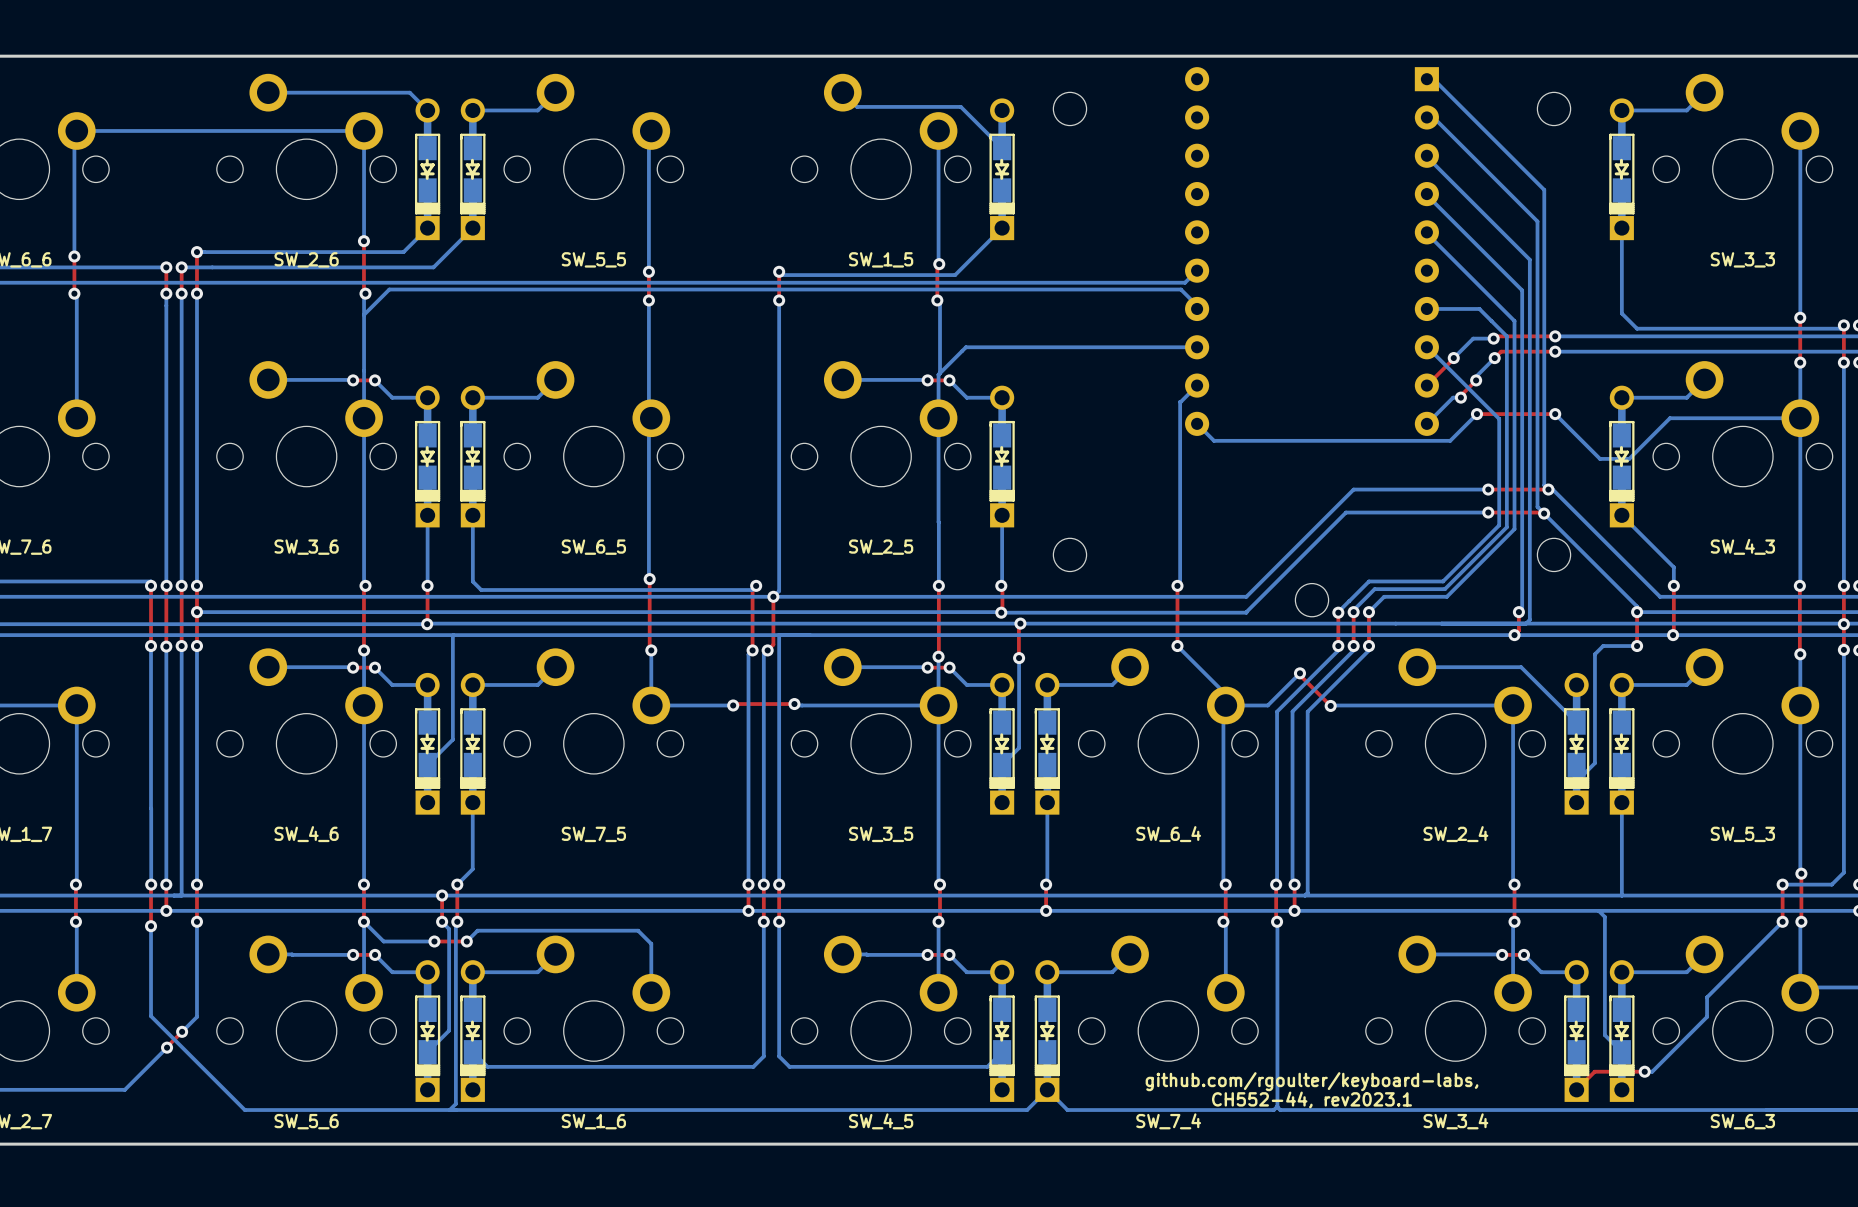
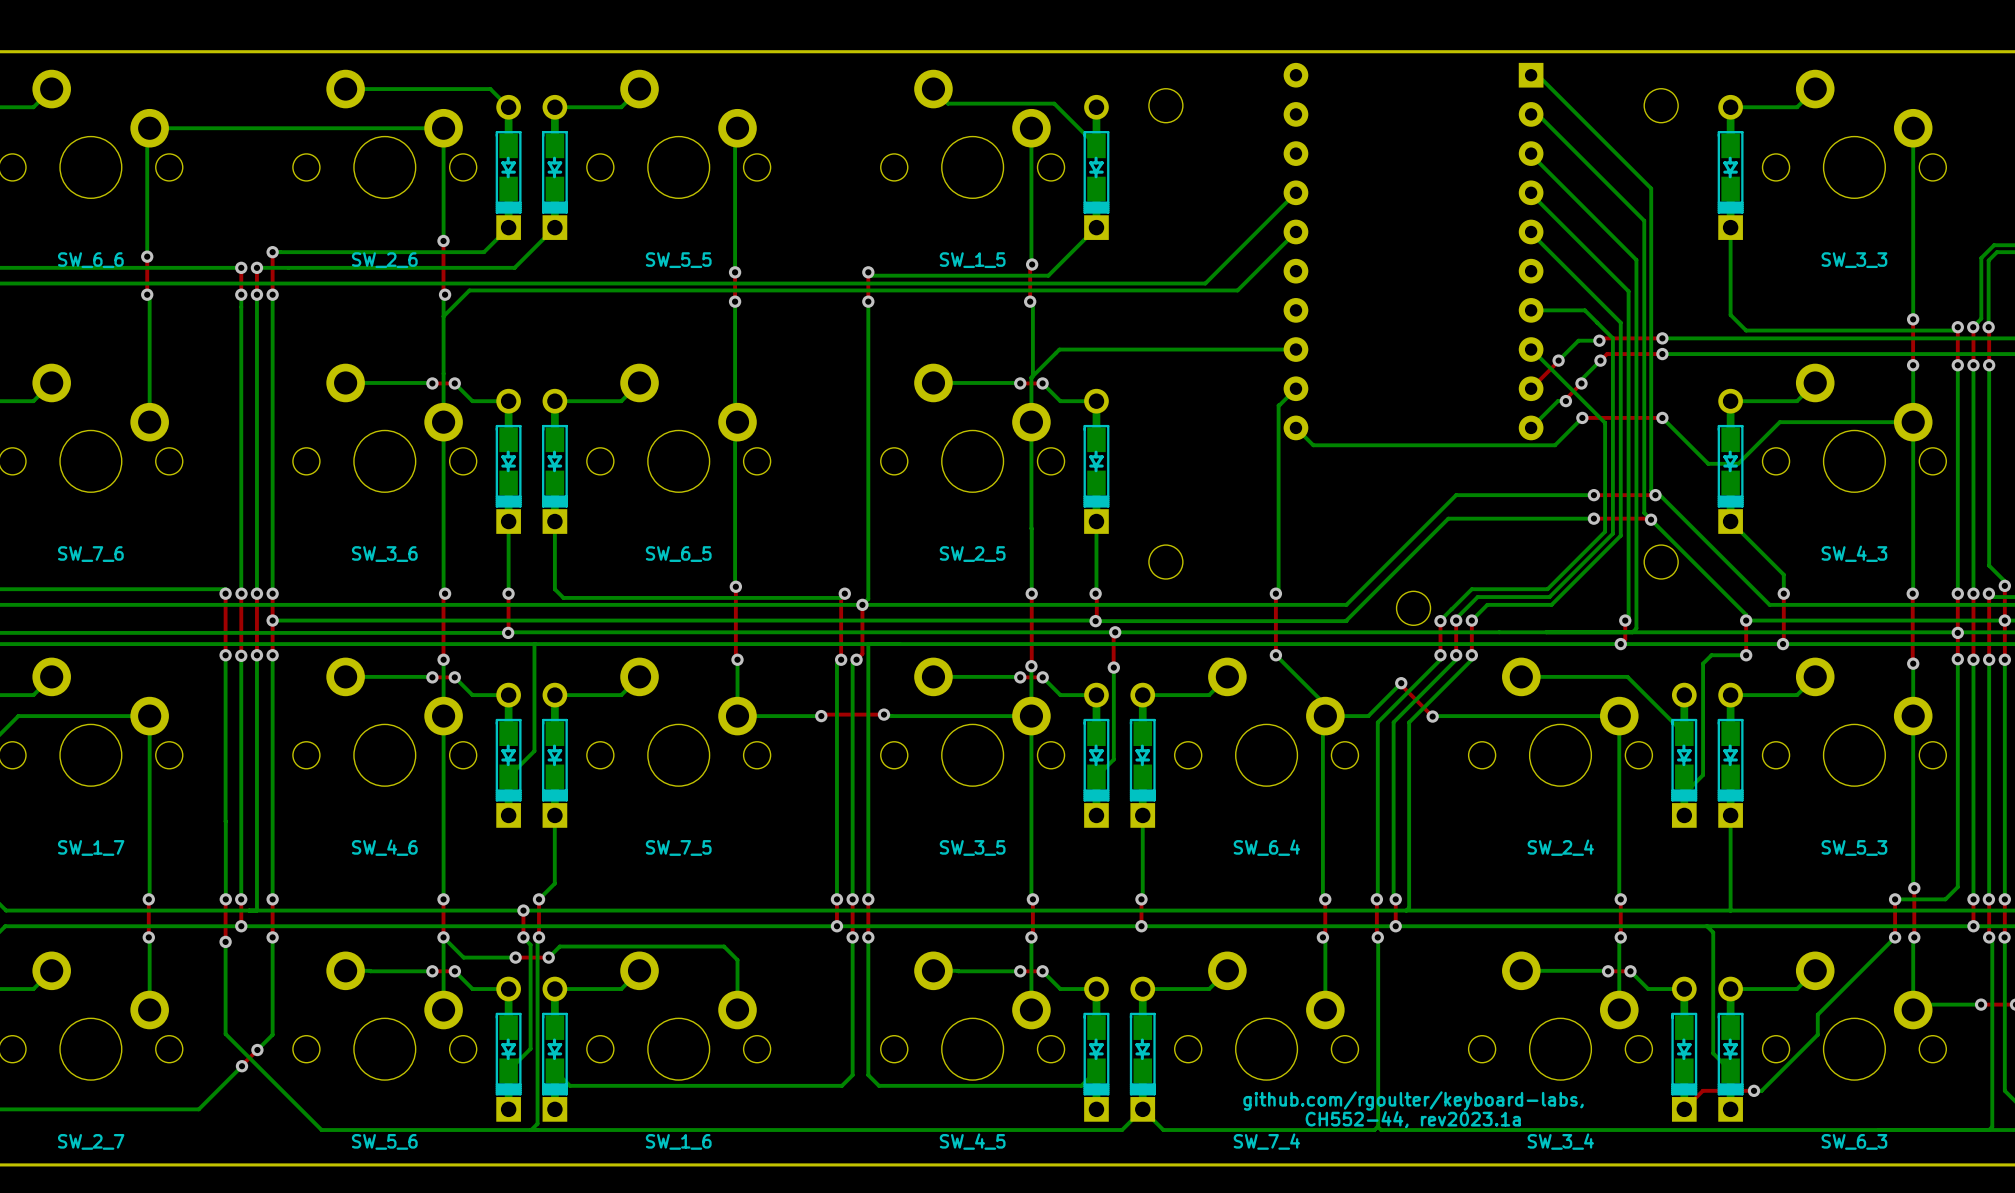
bottom track: (1197, 270) (1185, 282) (1108, 282) -> (1295, 192) (1205, 283)
bottom track: (1140, 289) (1180, 289) (1197, 305) (1197, 308) -> (1237, 290) (1295, 232)
text: CH552-44, rev2023.1 (1311, 1099) -> CH552-44, rev2023.1a (1413, 1119)

